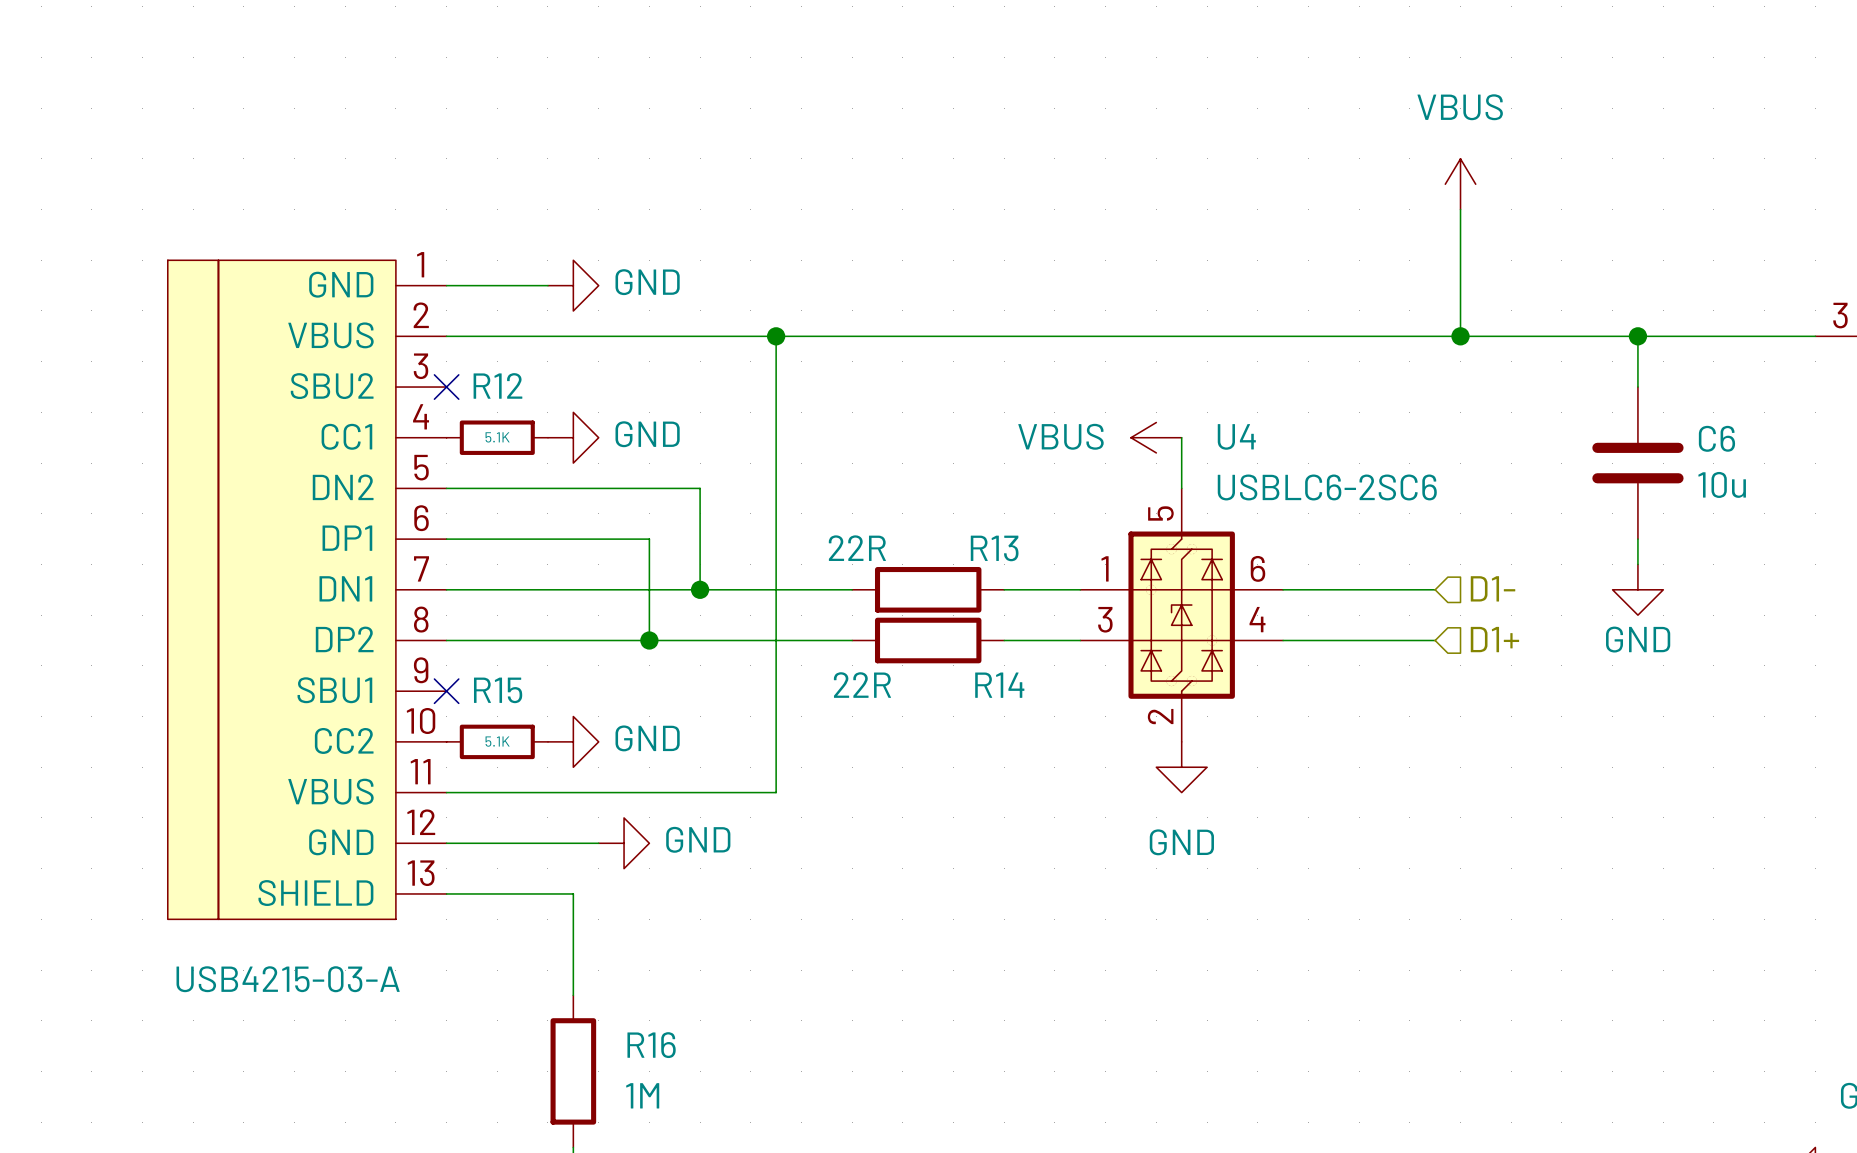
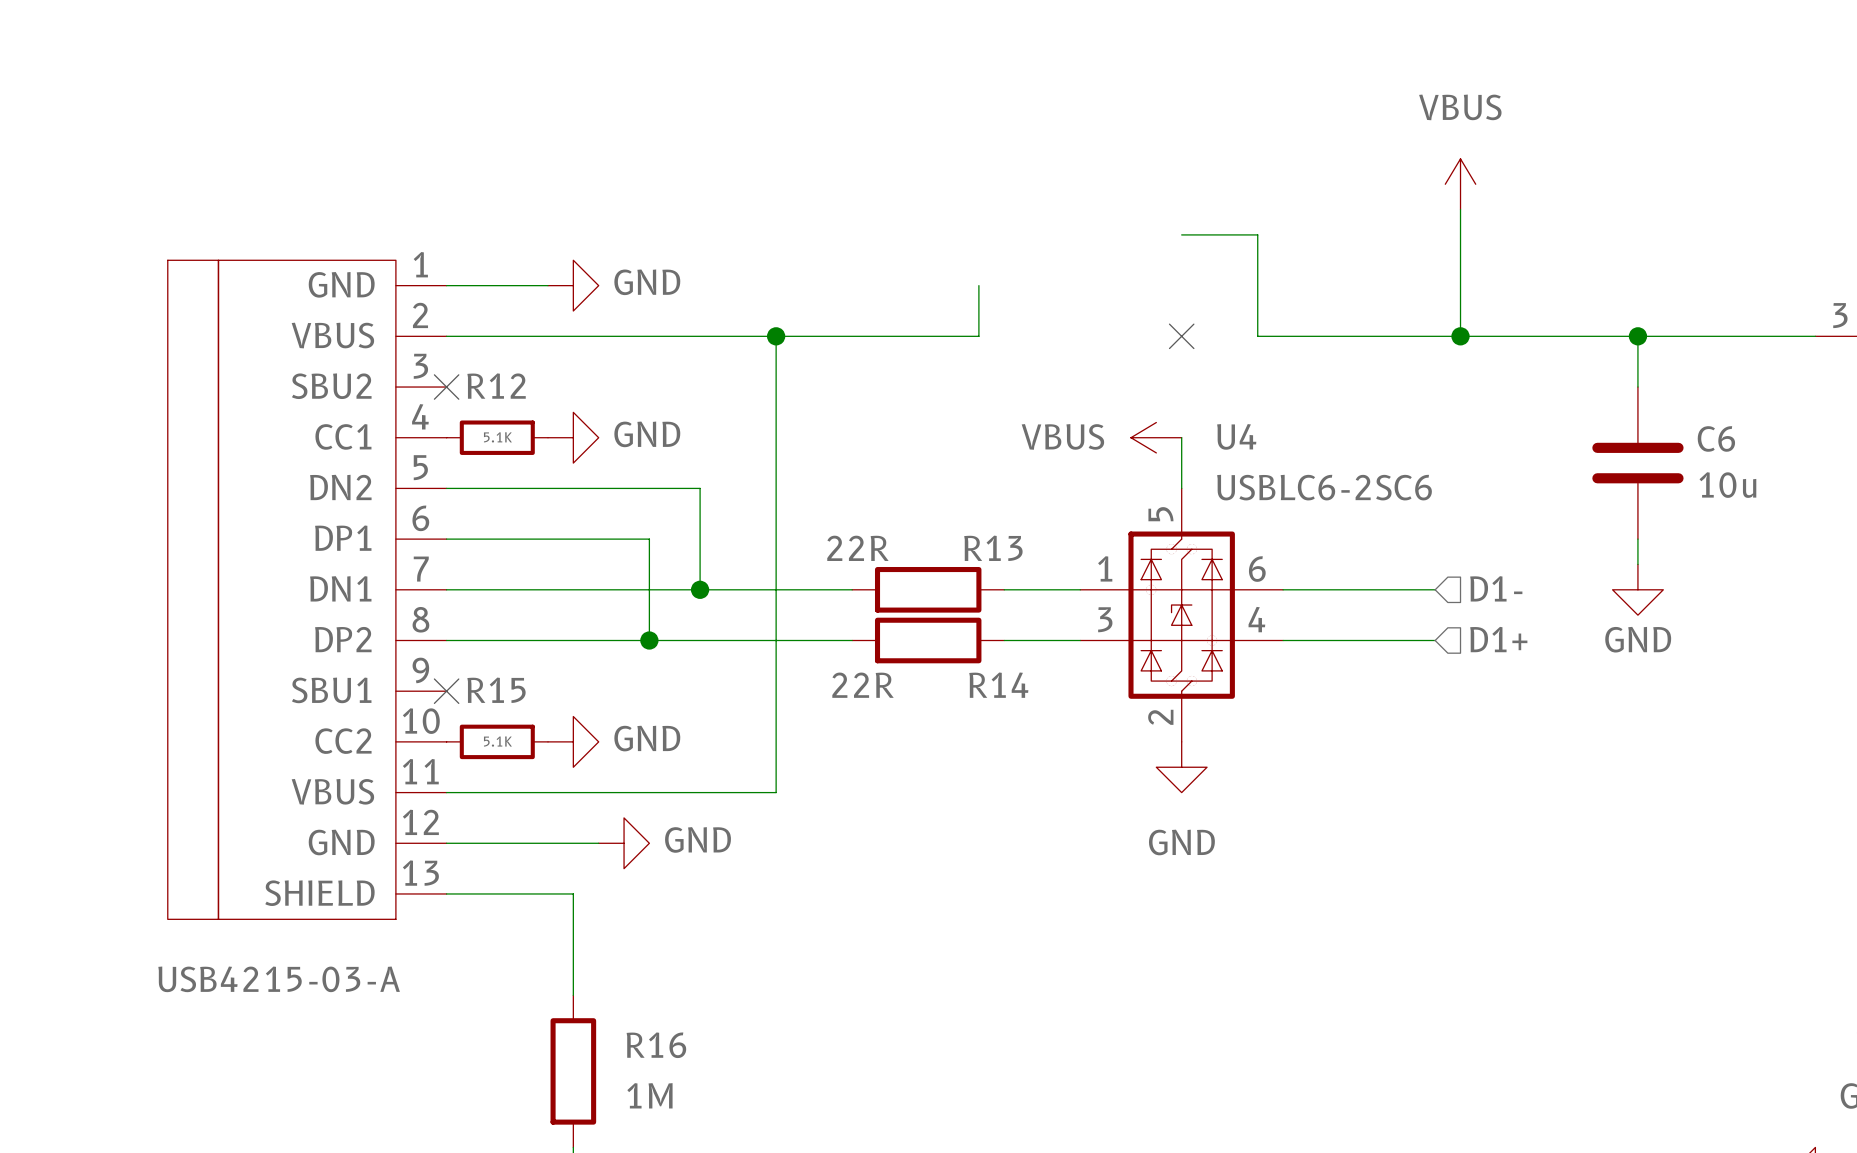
wire: none -> (978, 285) (978, 336)
wire: (978, 336) (1257, 336) -> (1181, 234) (1257, 234) (1257, 336)
no-connect mark: none -> (1181, 336)

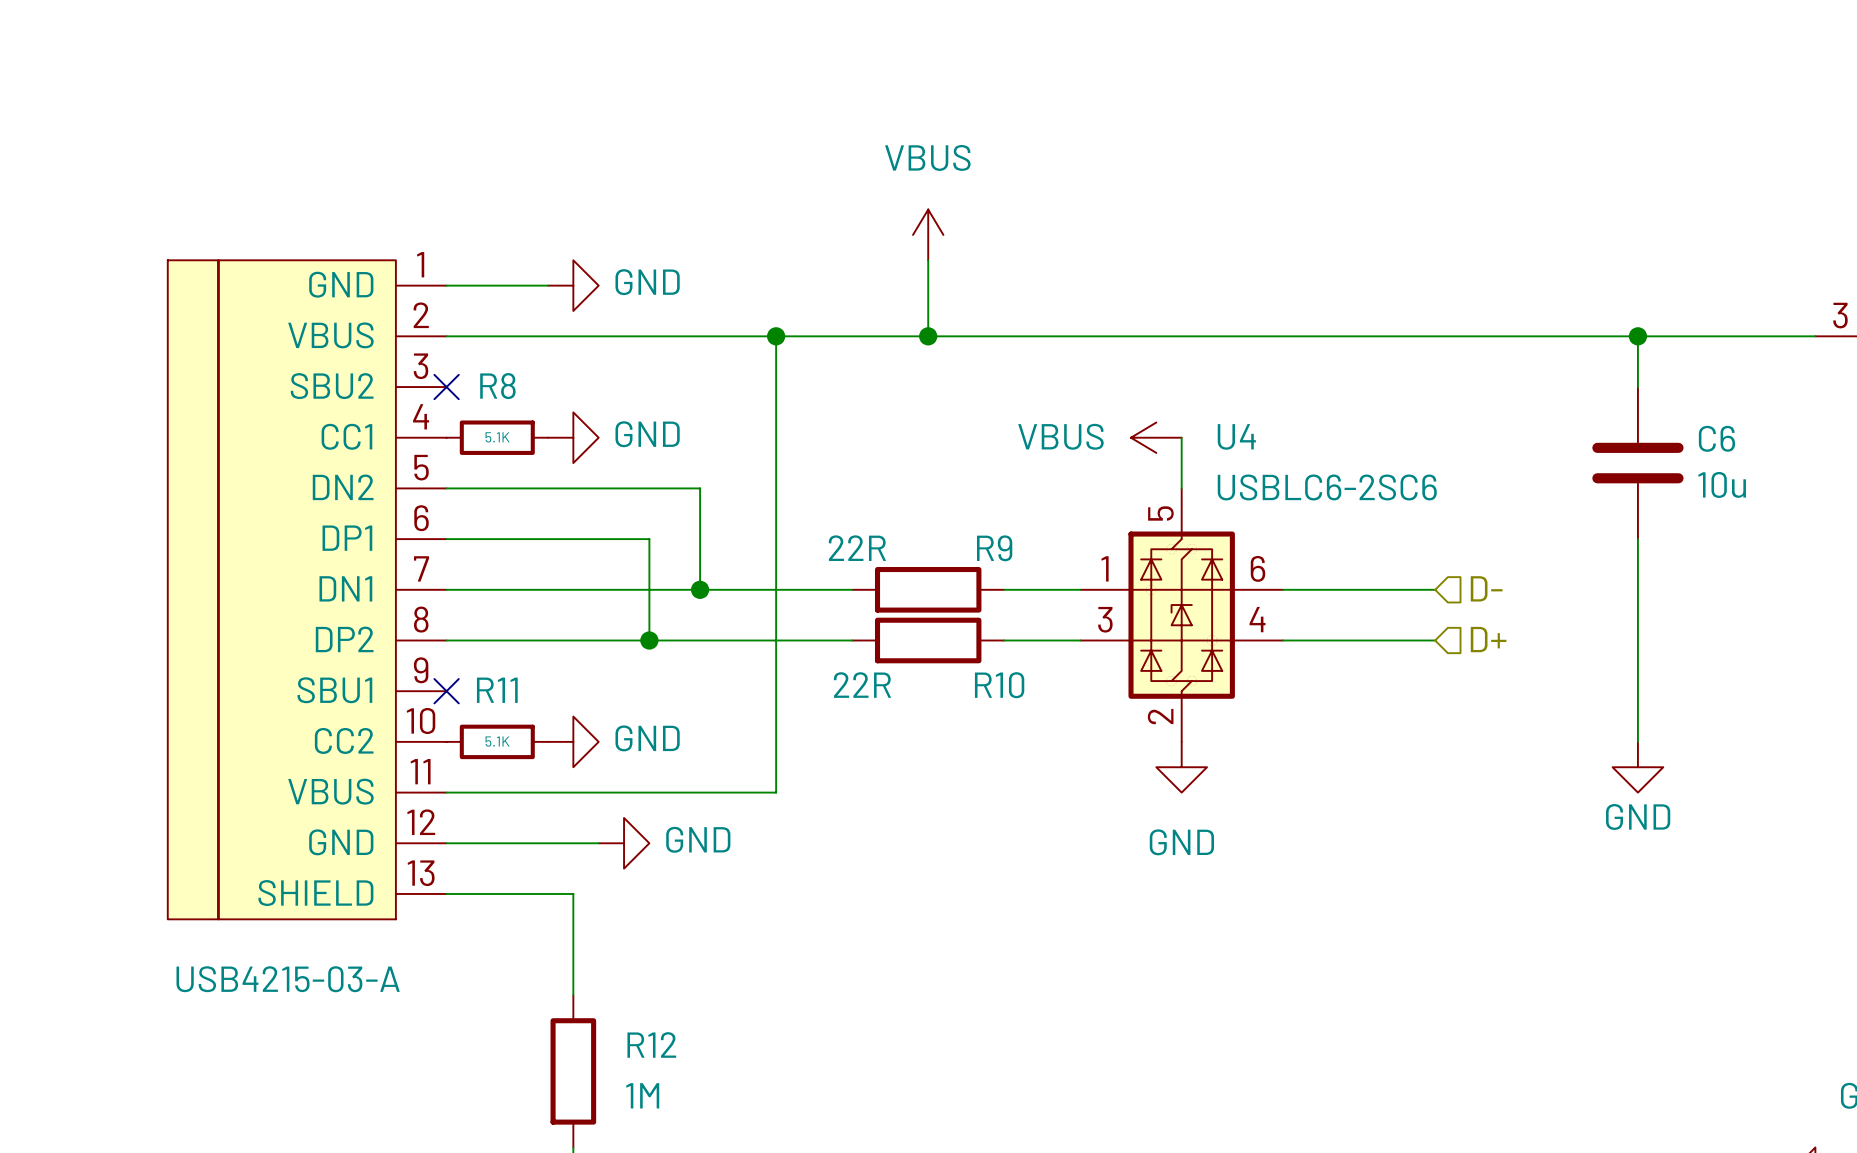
power symbol: VBUS (1460, 184) -> none
wire: (1460, 209) (1460, 336) -> none
power symbol: none -> VBUS (928, 234)
wire: (1181, 234) (1257, 234) (1257, 336) -> (978, 336) (1257, 336)
wire: none -> (928, 260) (928, 336)
wire: (978, 285) (978, 336) -> none
junction: none -> (928, 336)
no-connect mark: (1181, 336) -> none
junction: (1460, 336) -> none
R12 name: R12 (496, 386) -> R8 (497, 386)
R13 name: R13 (993, 548) -> R9 (994, 548)
wire: none -> (1637, 564) (1637, 741)
hierarchical label: D1- (1496, 588) -> D- (1486, 588)
power symbol position: GND (1637, 589) -> GND (1637, 767)
hierarchical label: D1+ (1498, 639) -> D+ (1488, 639)
R14 name: R14 (998, 685) -> R10 (999, 685)
R15 name: R15 (496, 690) -> R11 (497, 690)
R16 name: R16 (656, 1045) -> R12 (651, 1044)

